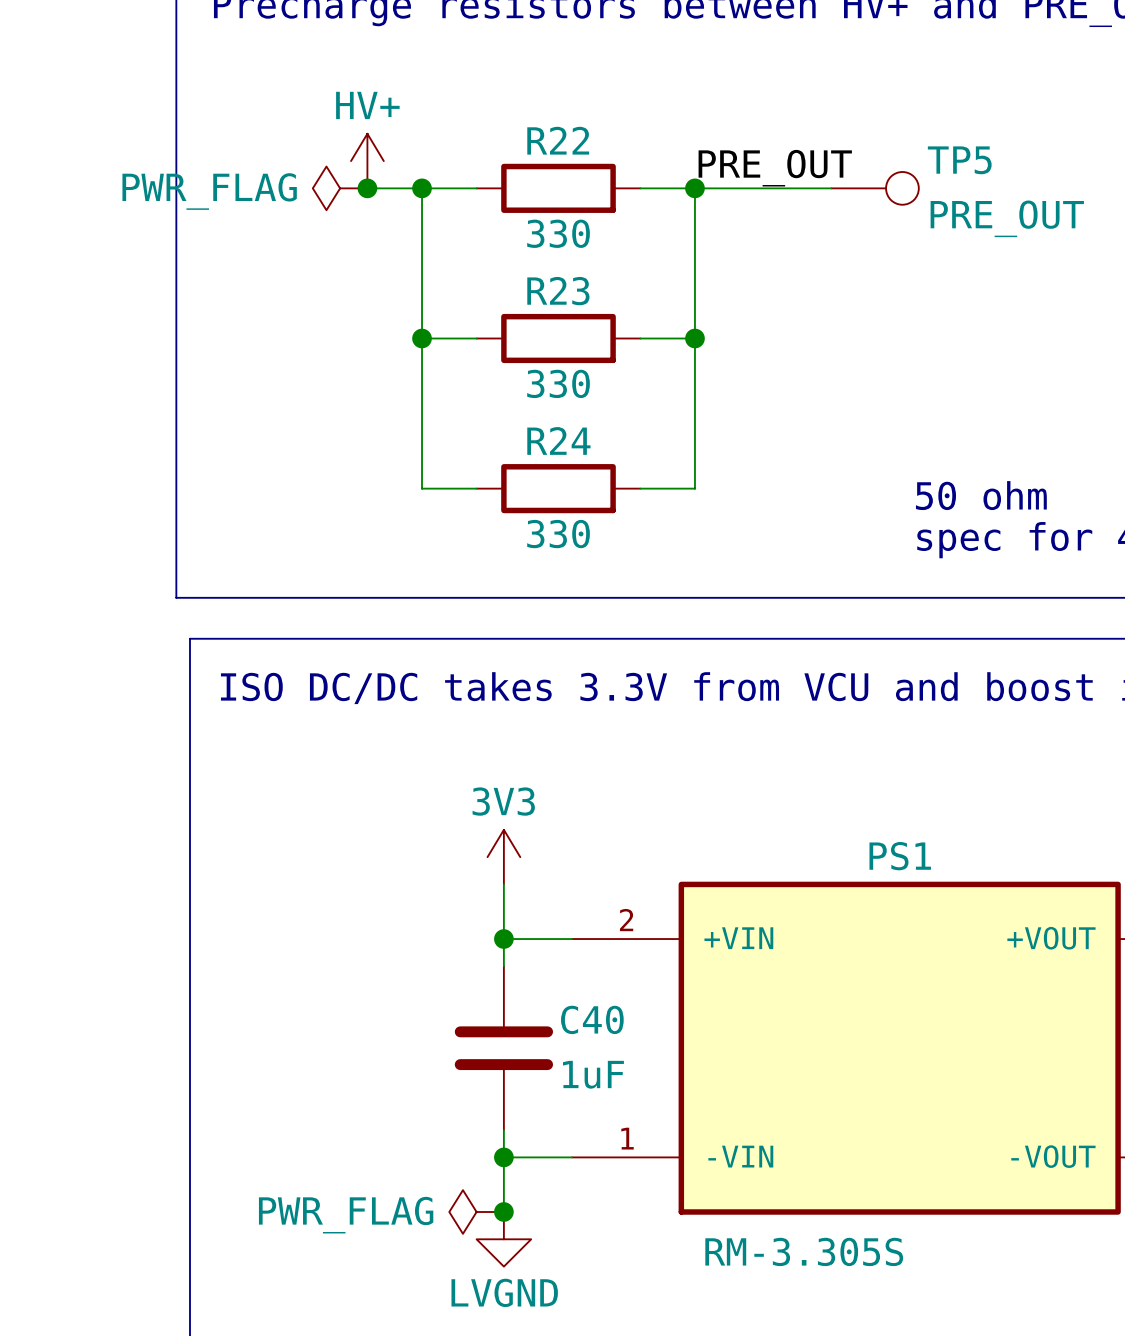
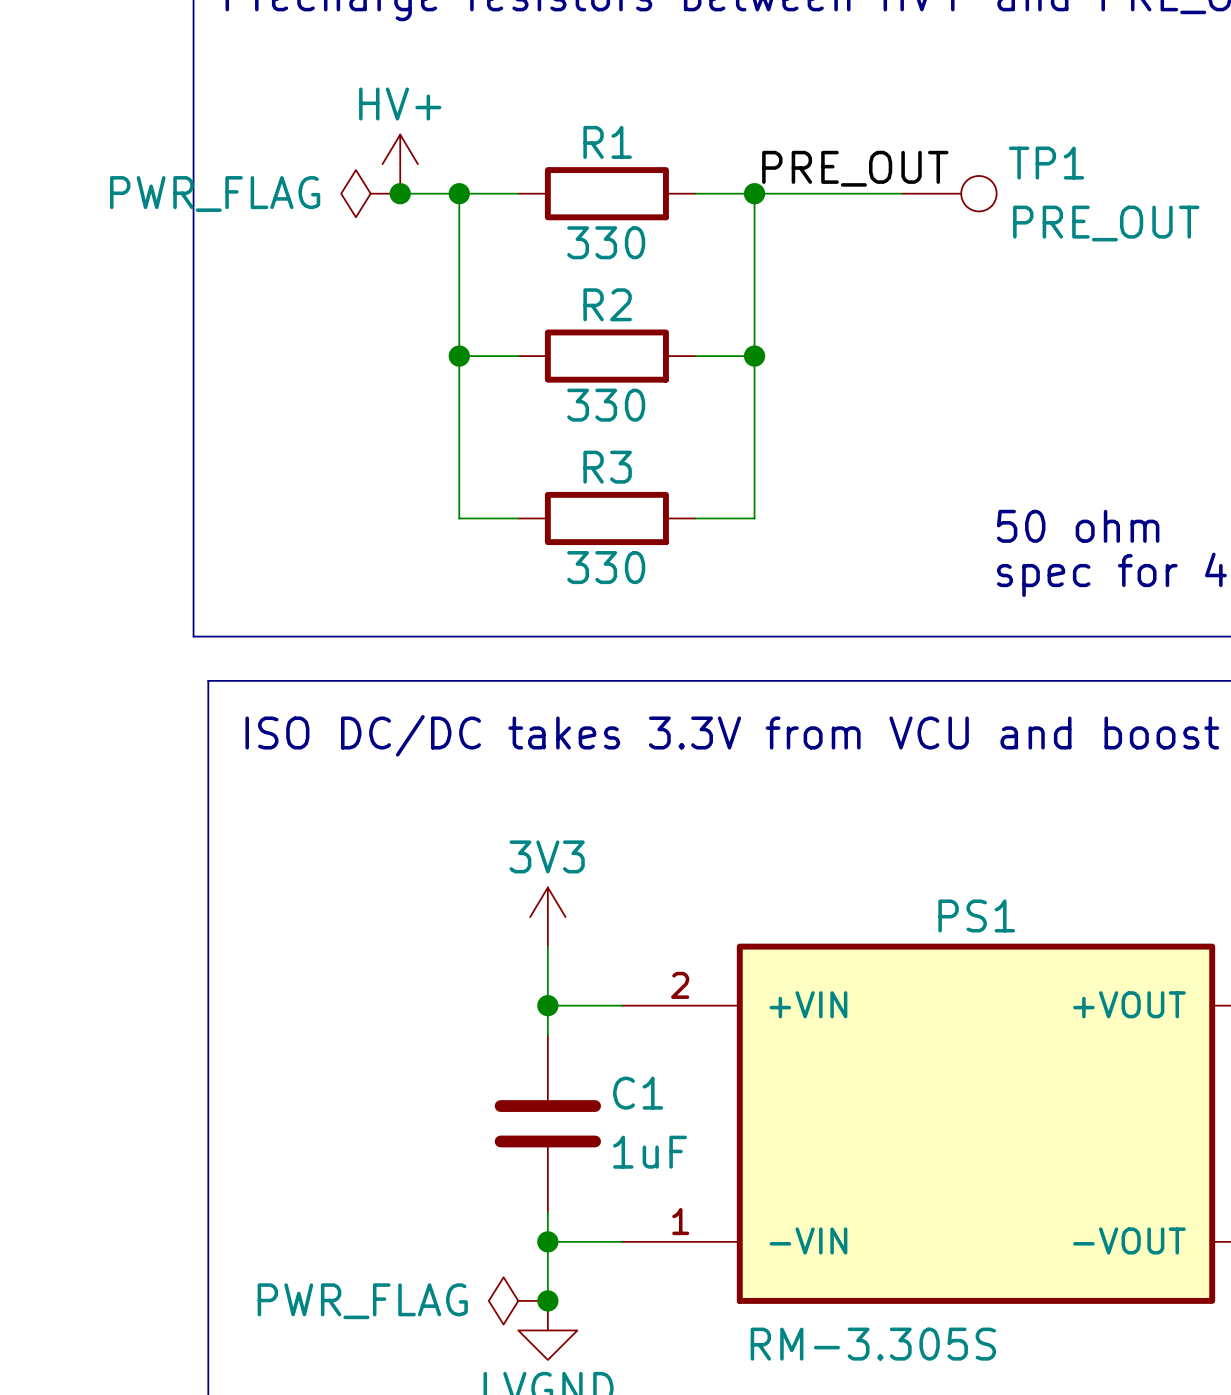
R22 name: R22 (558, 140) -> R1 (607, 142)
TP5 name: TP5 (959, 160) -> TP1 (1046, 163)
R23 name: R23 (558, 291) -> R2 (607, 304)
R24 name: R24 (558, 440) -> R3 (607, 467)
C40 name: C40 (592, 1019) -> C1 (638, 1093)

